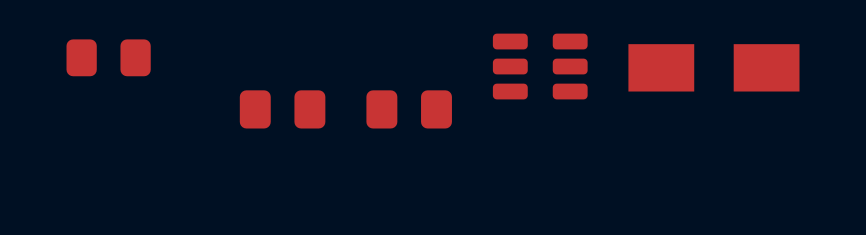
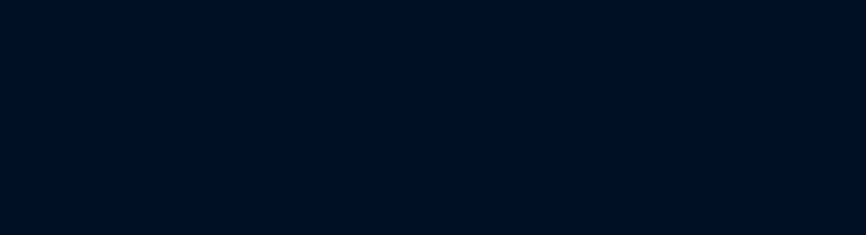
part: (108, 57) -> none
part: (540, 66) -> none
part: (713, 67) -> none
part: (282, 109) -> none
part: (409, 109) -> none

